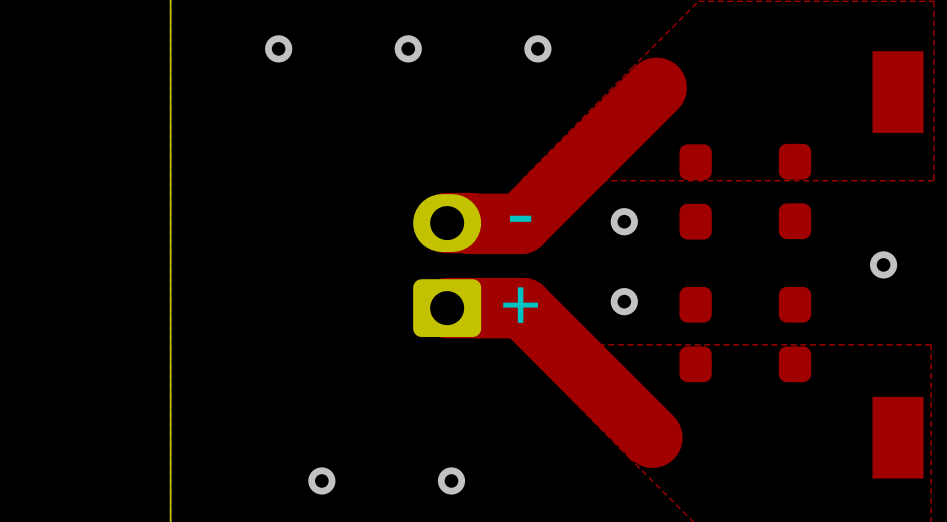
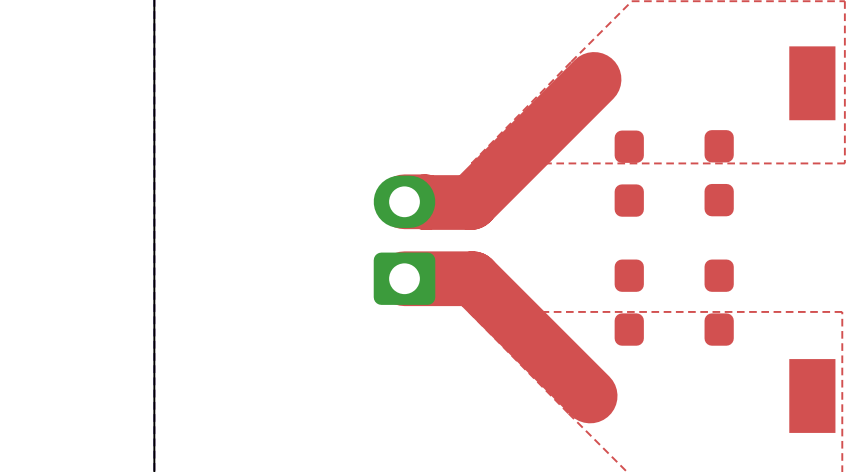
via: (278, 48) -> none
via: (408, 48) -> none
via: (537, 48) -> none
text: - (520, 218) -> none
via: (624, 221) -> none
via: (883, 264) -> none
via: (624, 301) -> none
text: + (520, 305) -> none
via: (321, 480) -> none
via: (451, 480) -> none

